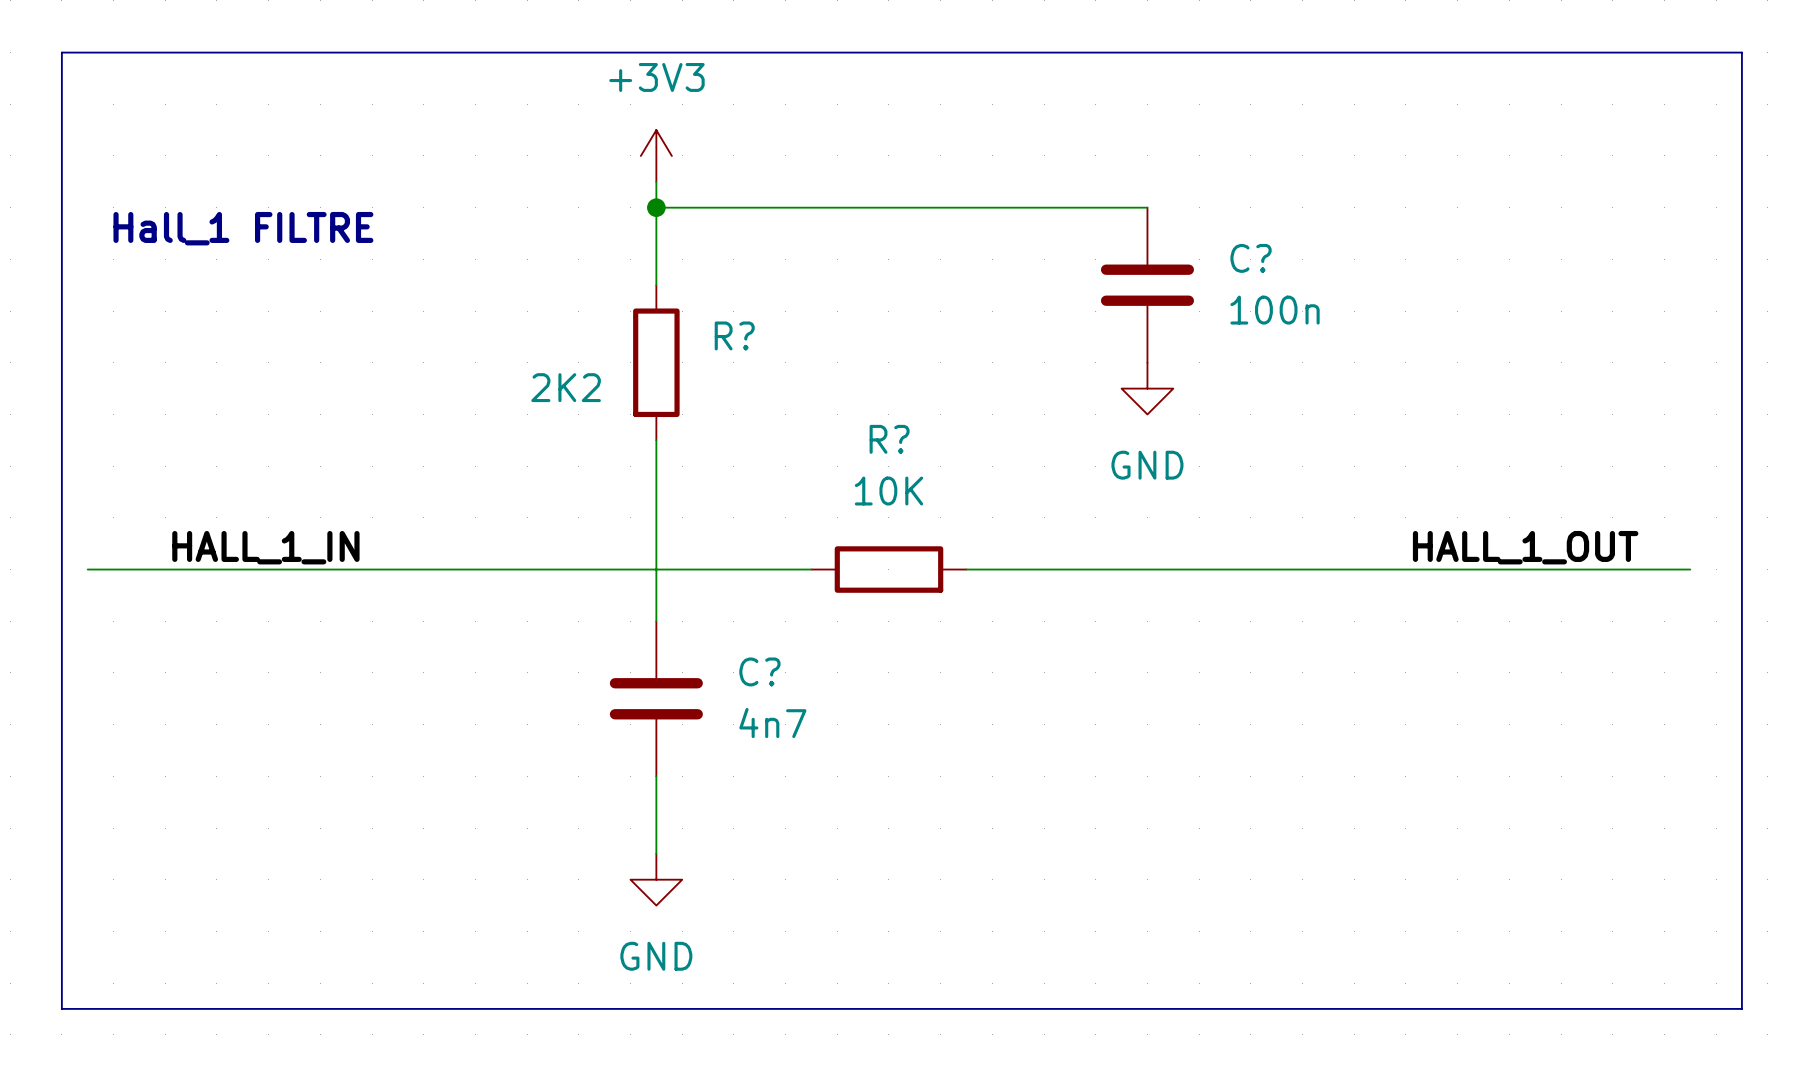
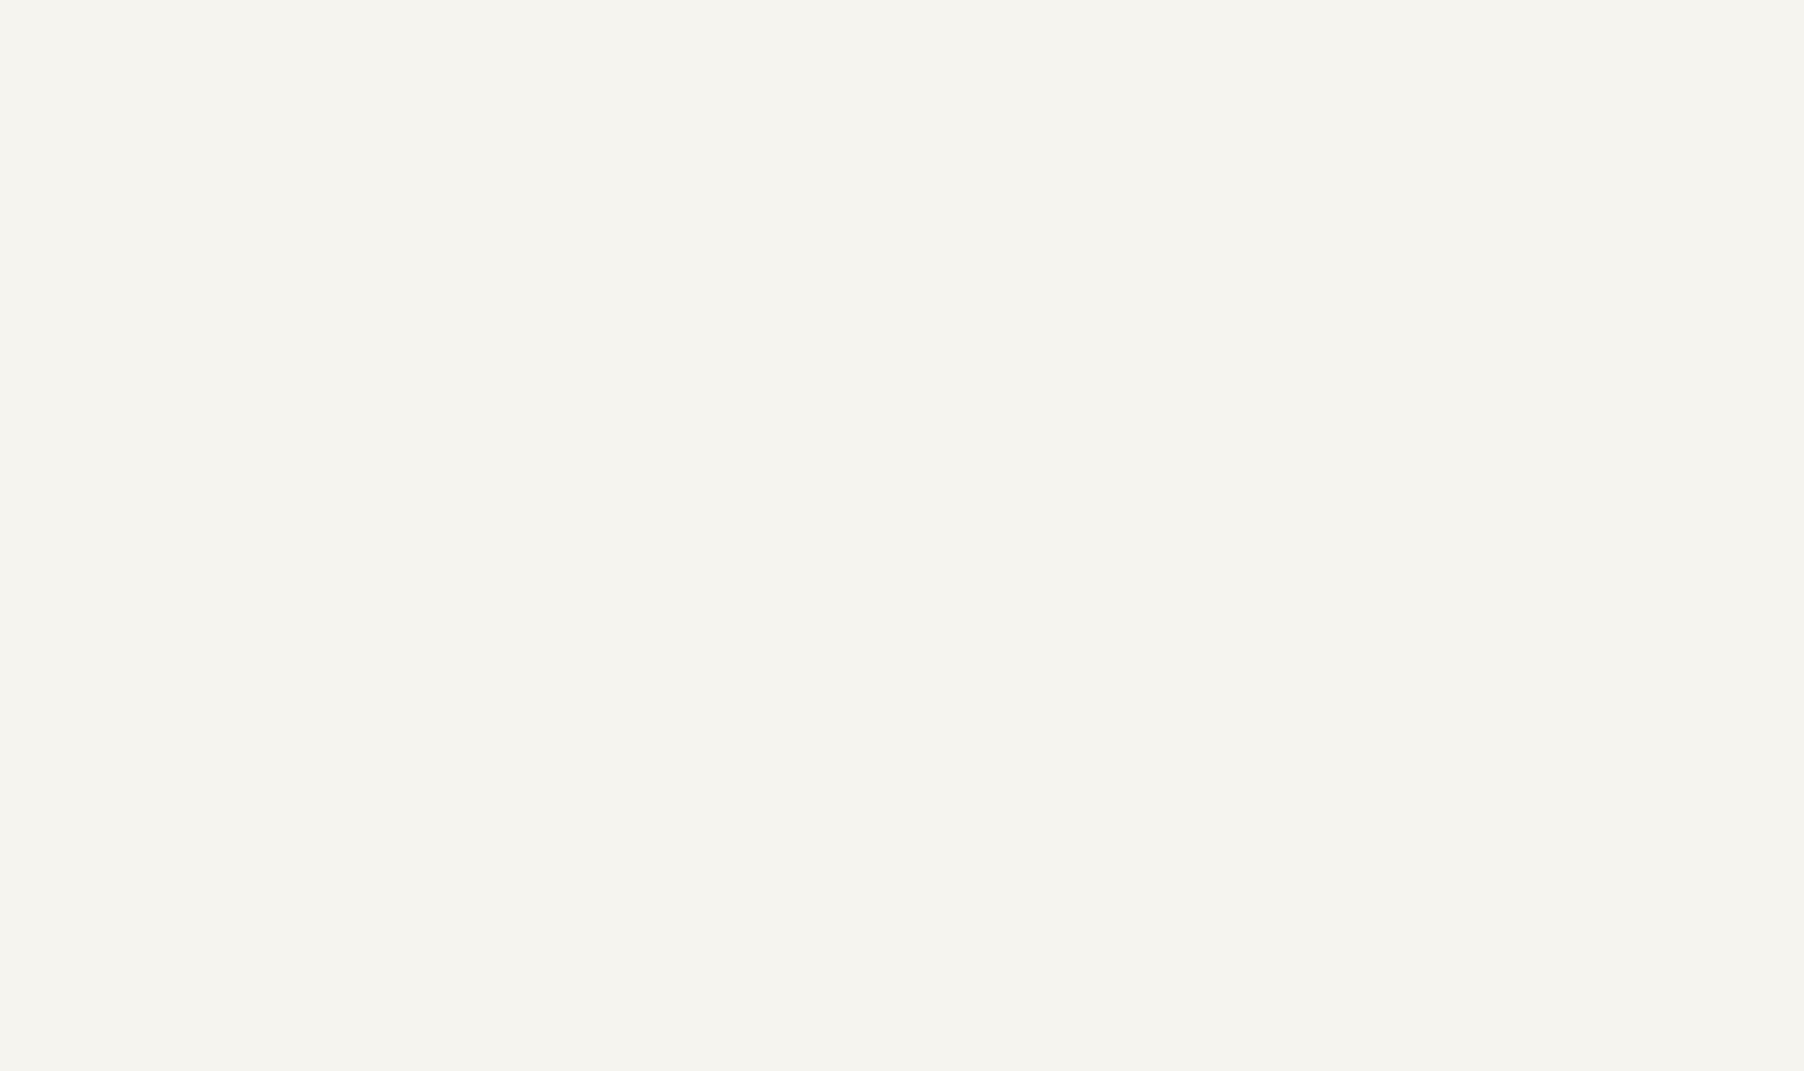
line: (61, 52) (1741, 52) (1741, 1008) (61, 1008) (61, 52) -> none
power symbol: +3V3 (656, 155) -> none
wire: (656, 181) (656, 285) -> none
wire: (656, 207) (1147, 207) -> none
junction: (656, 207) -> none
text: Hall_1 FILTRE (243, 228) -> none
C?: 100n (1147, 285) -> none
R?: 2K2 (656, 362) -> none
power symbol: GND (1147, 388) -> none
wire: (656, 440) (656, 621) -> none
label: HALL_1_IN (265, 547) -> none
label: HALL_1_OUT (1525, 547) -> none
wire: (87, 569) (811, 569) -> none
R?: 10K (888, 569) -> none
wire: (966, 569) (1690, 569) -> none
C?: 4n7 (656, 698) -> none
wire: (656, 776) (656, 853) -> none
power symbol: GND (656, 879) -> none

